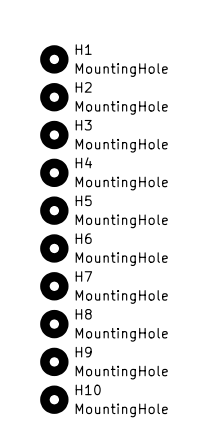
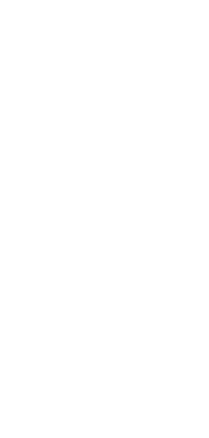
H1: MountingHole (54, 59) -> none
H2: MountingHole (54, 97) -> none
H3: MountingHole (54, 135) -> none
H4: MountingHole (54, 172) -> none
H5: MountingHole (54, 210) -> none
H6: MountingHole (54, 248) -> none
H7: MountingHole (54, 286) -> none
H8: MountingHole (54, 324) -> none
H9: MountingHole (54, 361) -> none
H10: MountingHole (54, 399) -> none

